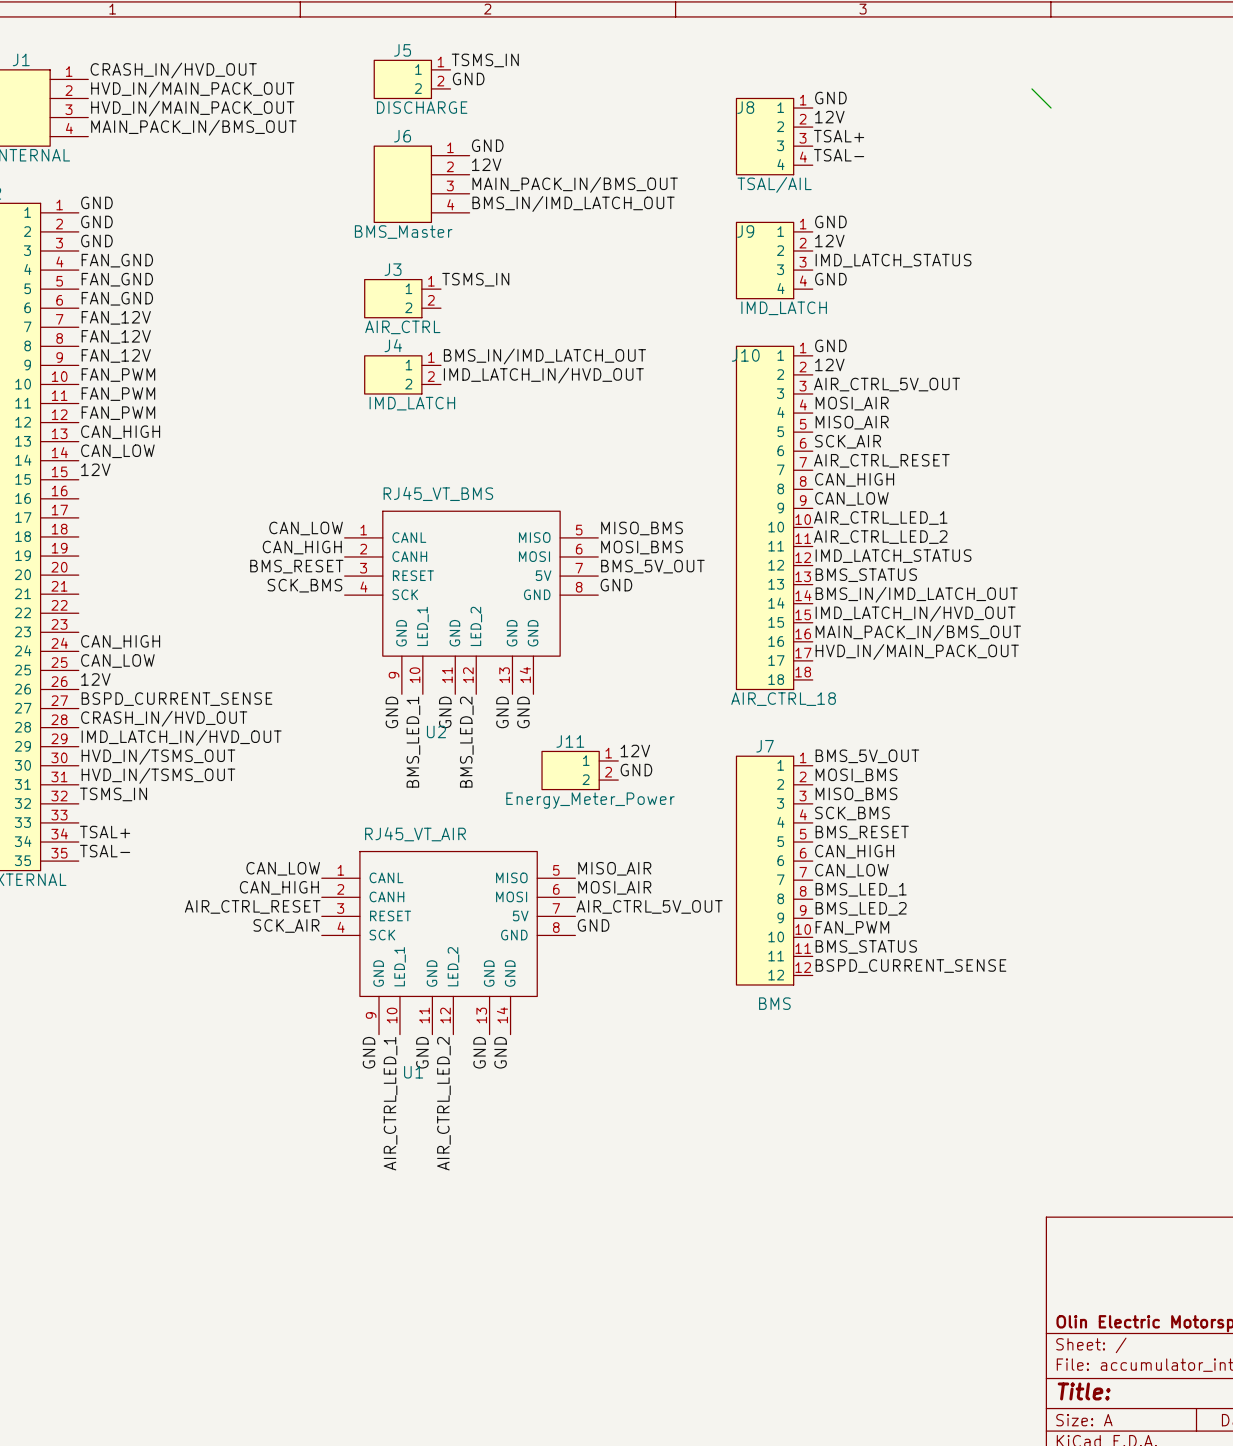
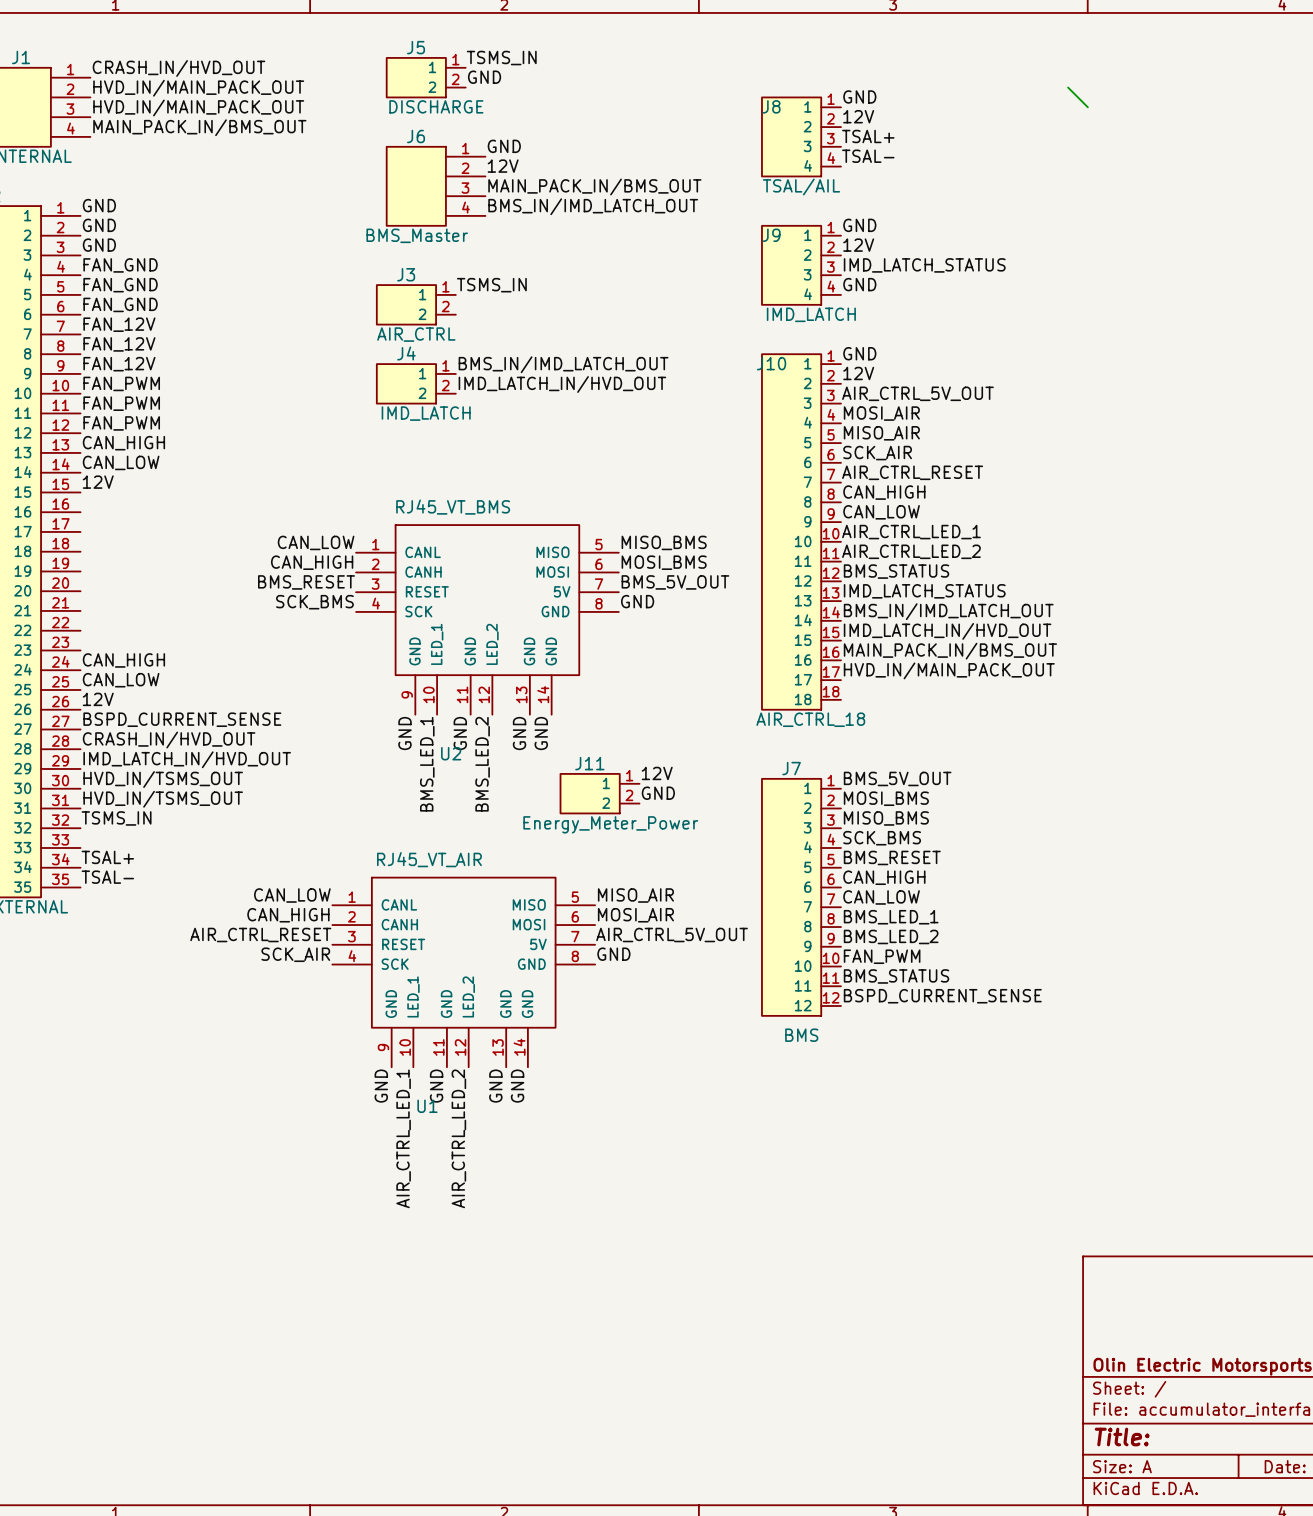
label: IMD_LATCH_STATUS (893, 556) -> BMS_STATUS (896, 571)
label: BMS_STATUS (866, 575) -> IMD_LATCH_STATUS (924, 591)

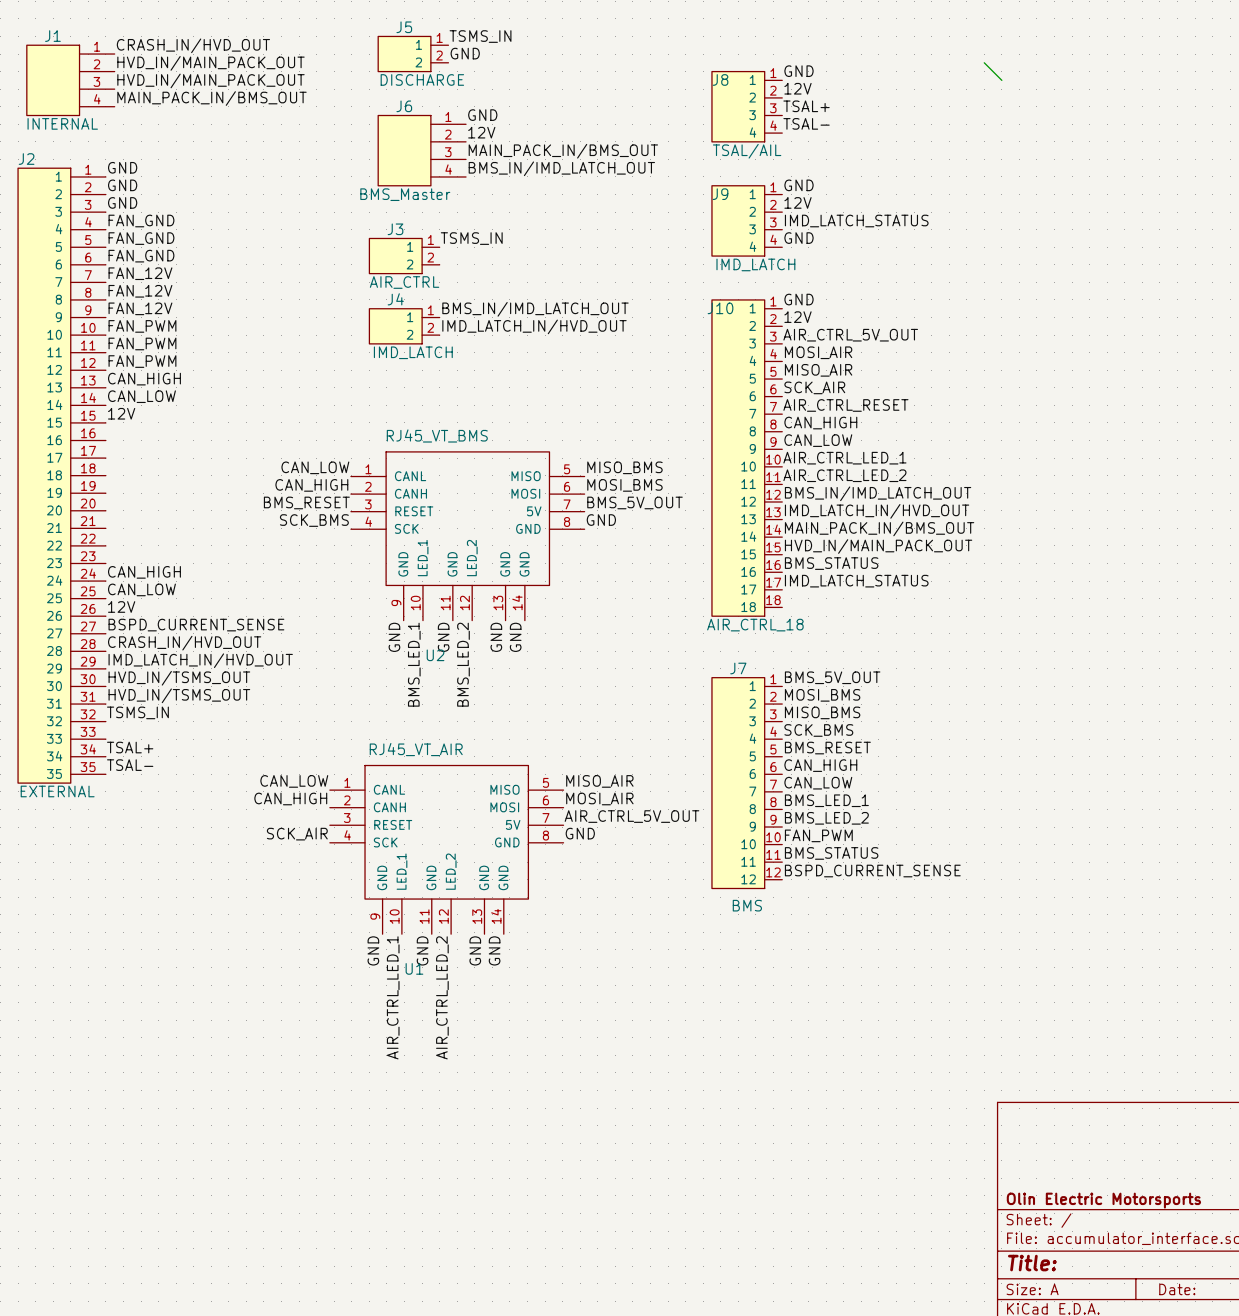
label: BMS_STATUS (896, 571) -> BMS_IN/IMD_LATCH_OUT (878, 493)
label: IMD_LATCH_STATUS (924, 591) -> IMD_LATCH_IN/HVD_OUT (877, 511)
label: BMS_IN/IMD_LATCH_OUT (948, 611) -> MAIN_PACK_IN/BMS_OUT (879, 528)
label: IMD_LATCH_IN/HVD_OUT (947, 631) -> HVD_IN/MAIN_PACK_OUT (878, 546)
label: MAIN_PACK_IN/BMS_OUT (950, 651) -> BMS_STATUS (831, 563)
label: HVD_IN/MAIN_PACK_OUT (949, 670) -> IMD_LATCH_STATUS (856, 581)
label: 12V (657, 773) -> none
J11: Energy_Meter_Power (600, 793) -> none
label: GND (658, 793) -> none
label: AIR_CTRL_RESET (260, 935) -> none

